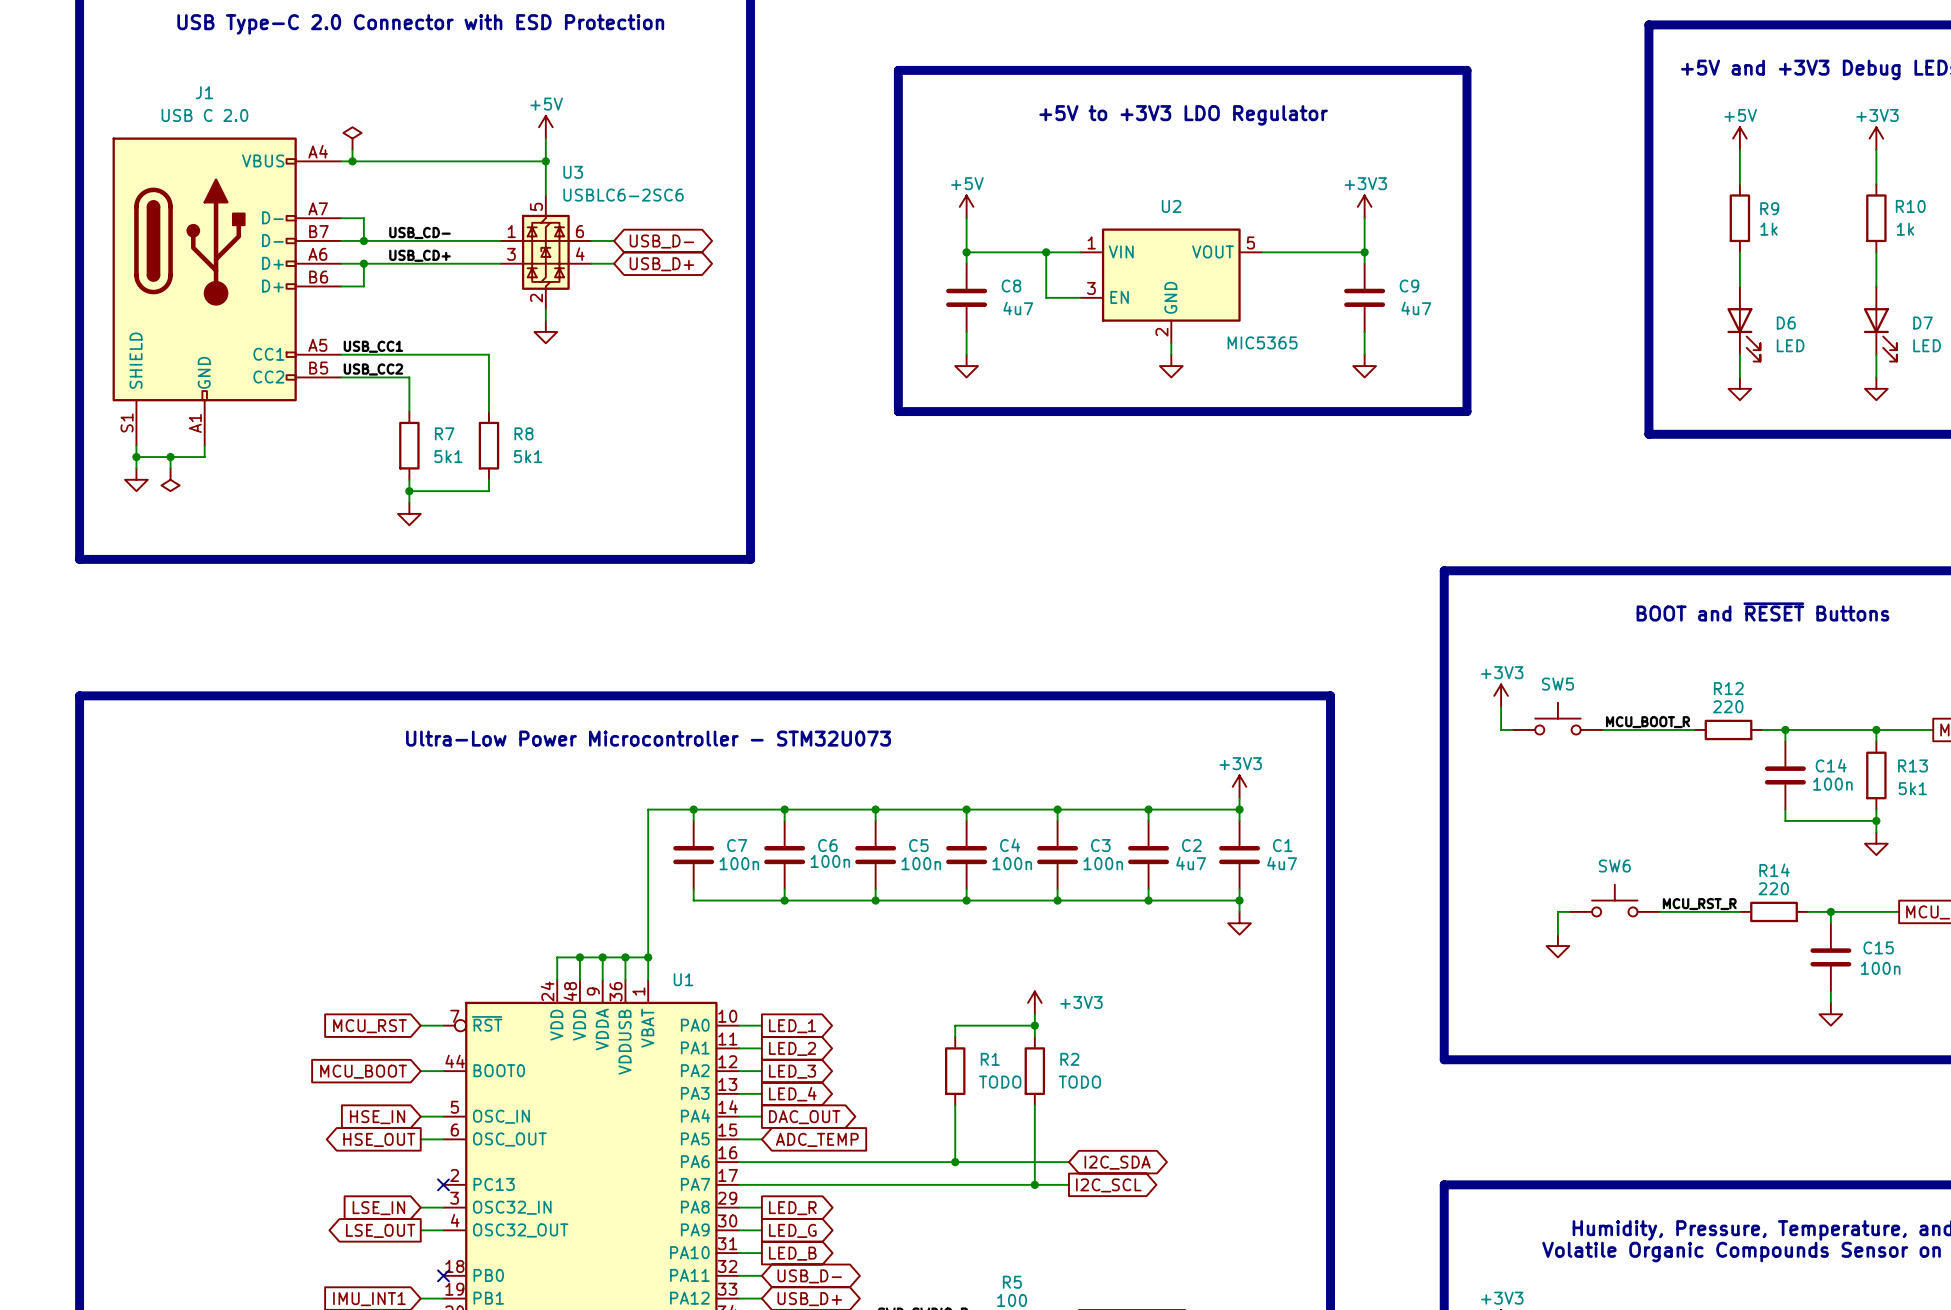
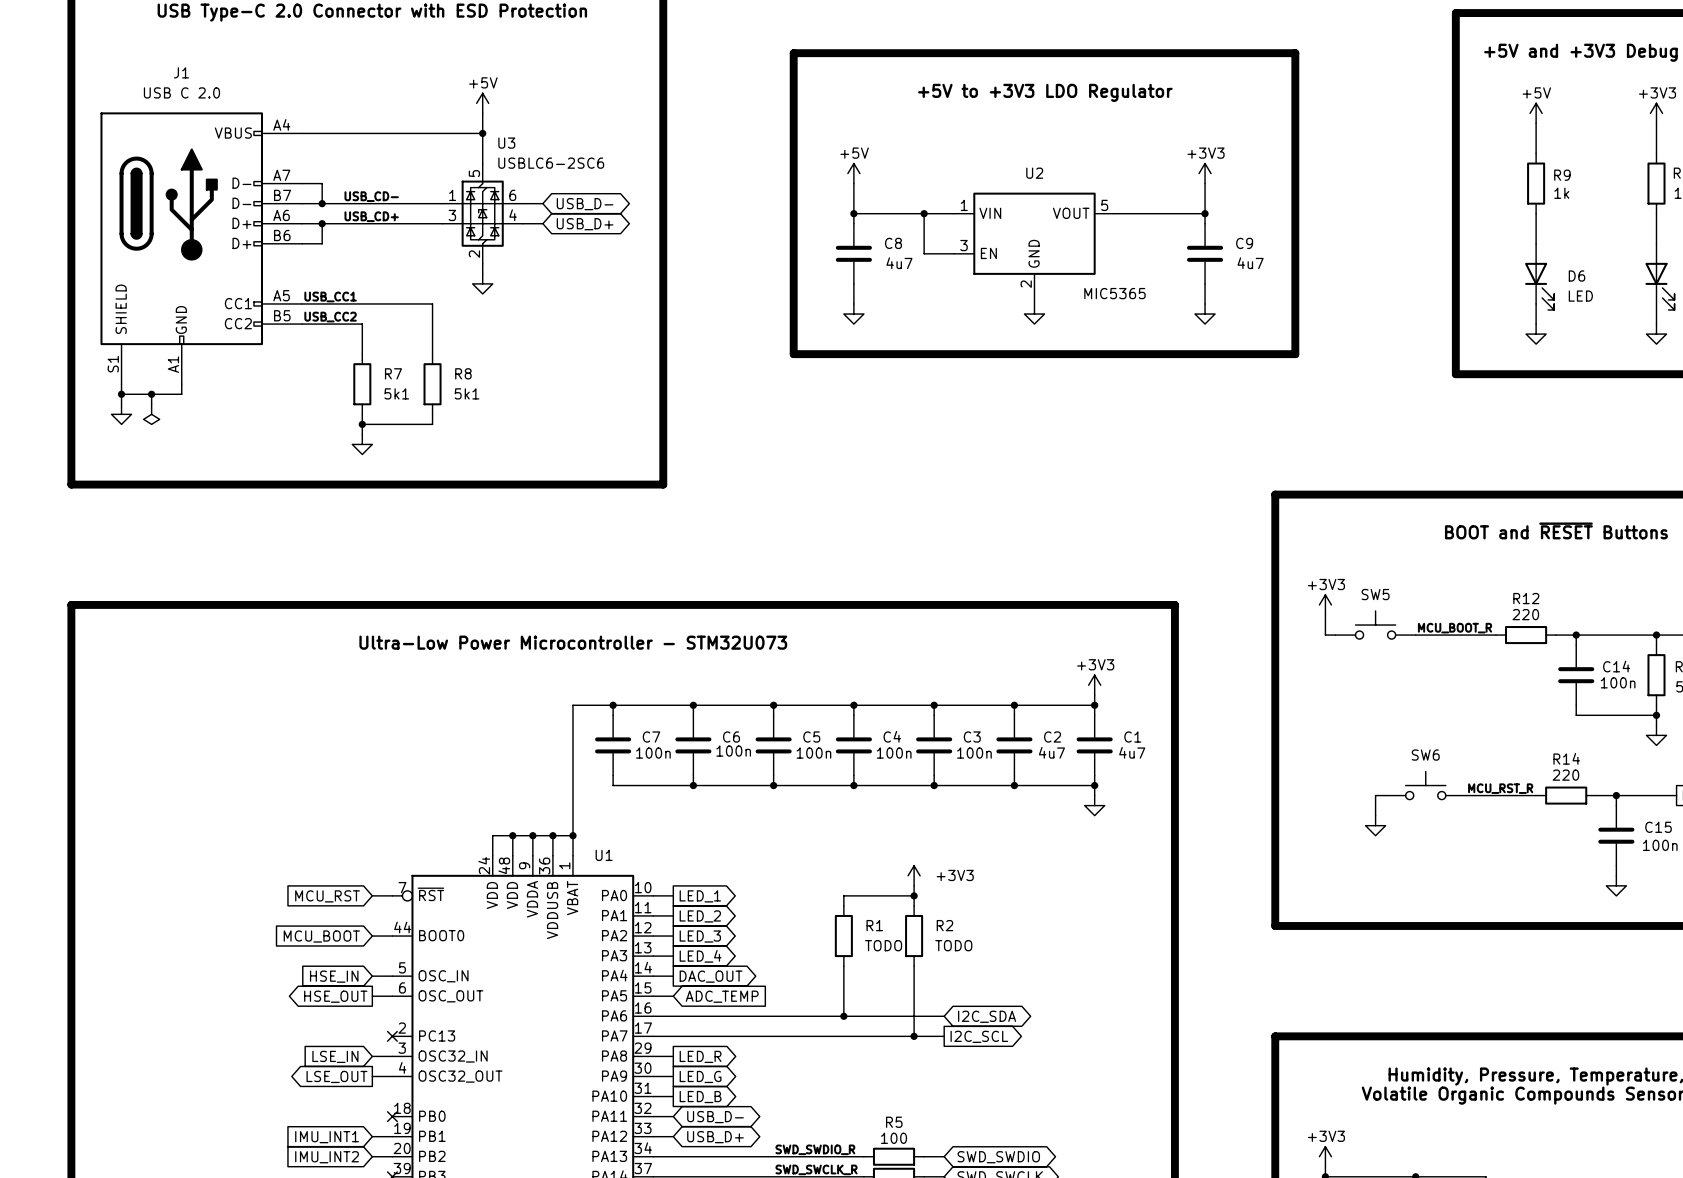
power symbol: (352, 138) -> none
wire: (352, 150) (352, 161) -> none
junction: (352, 161) -> none

